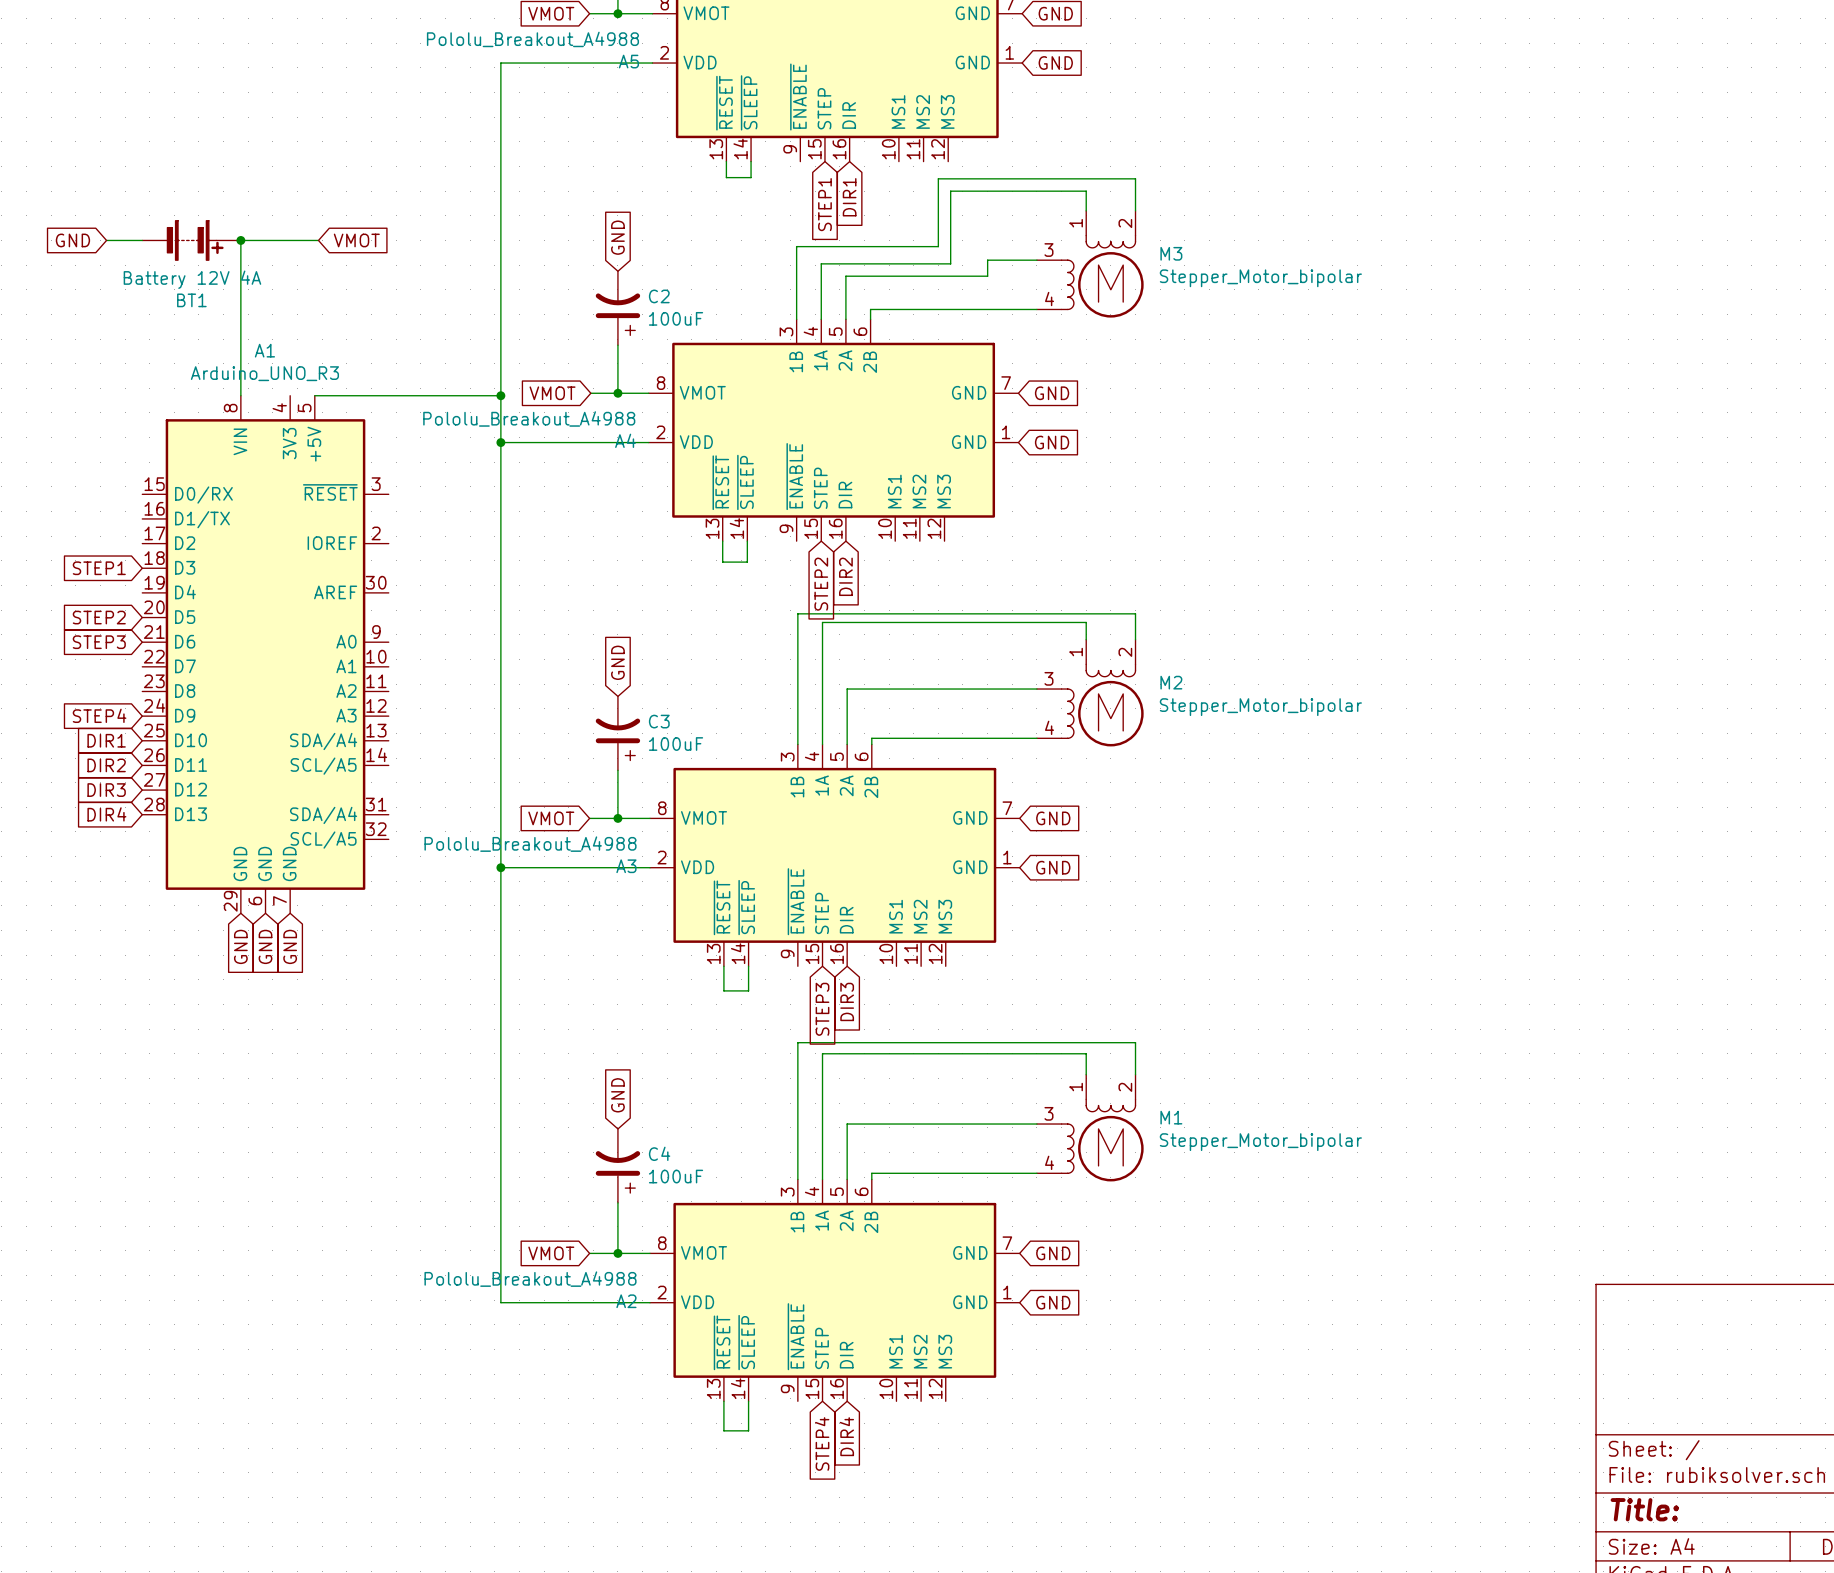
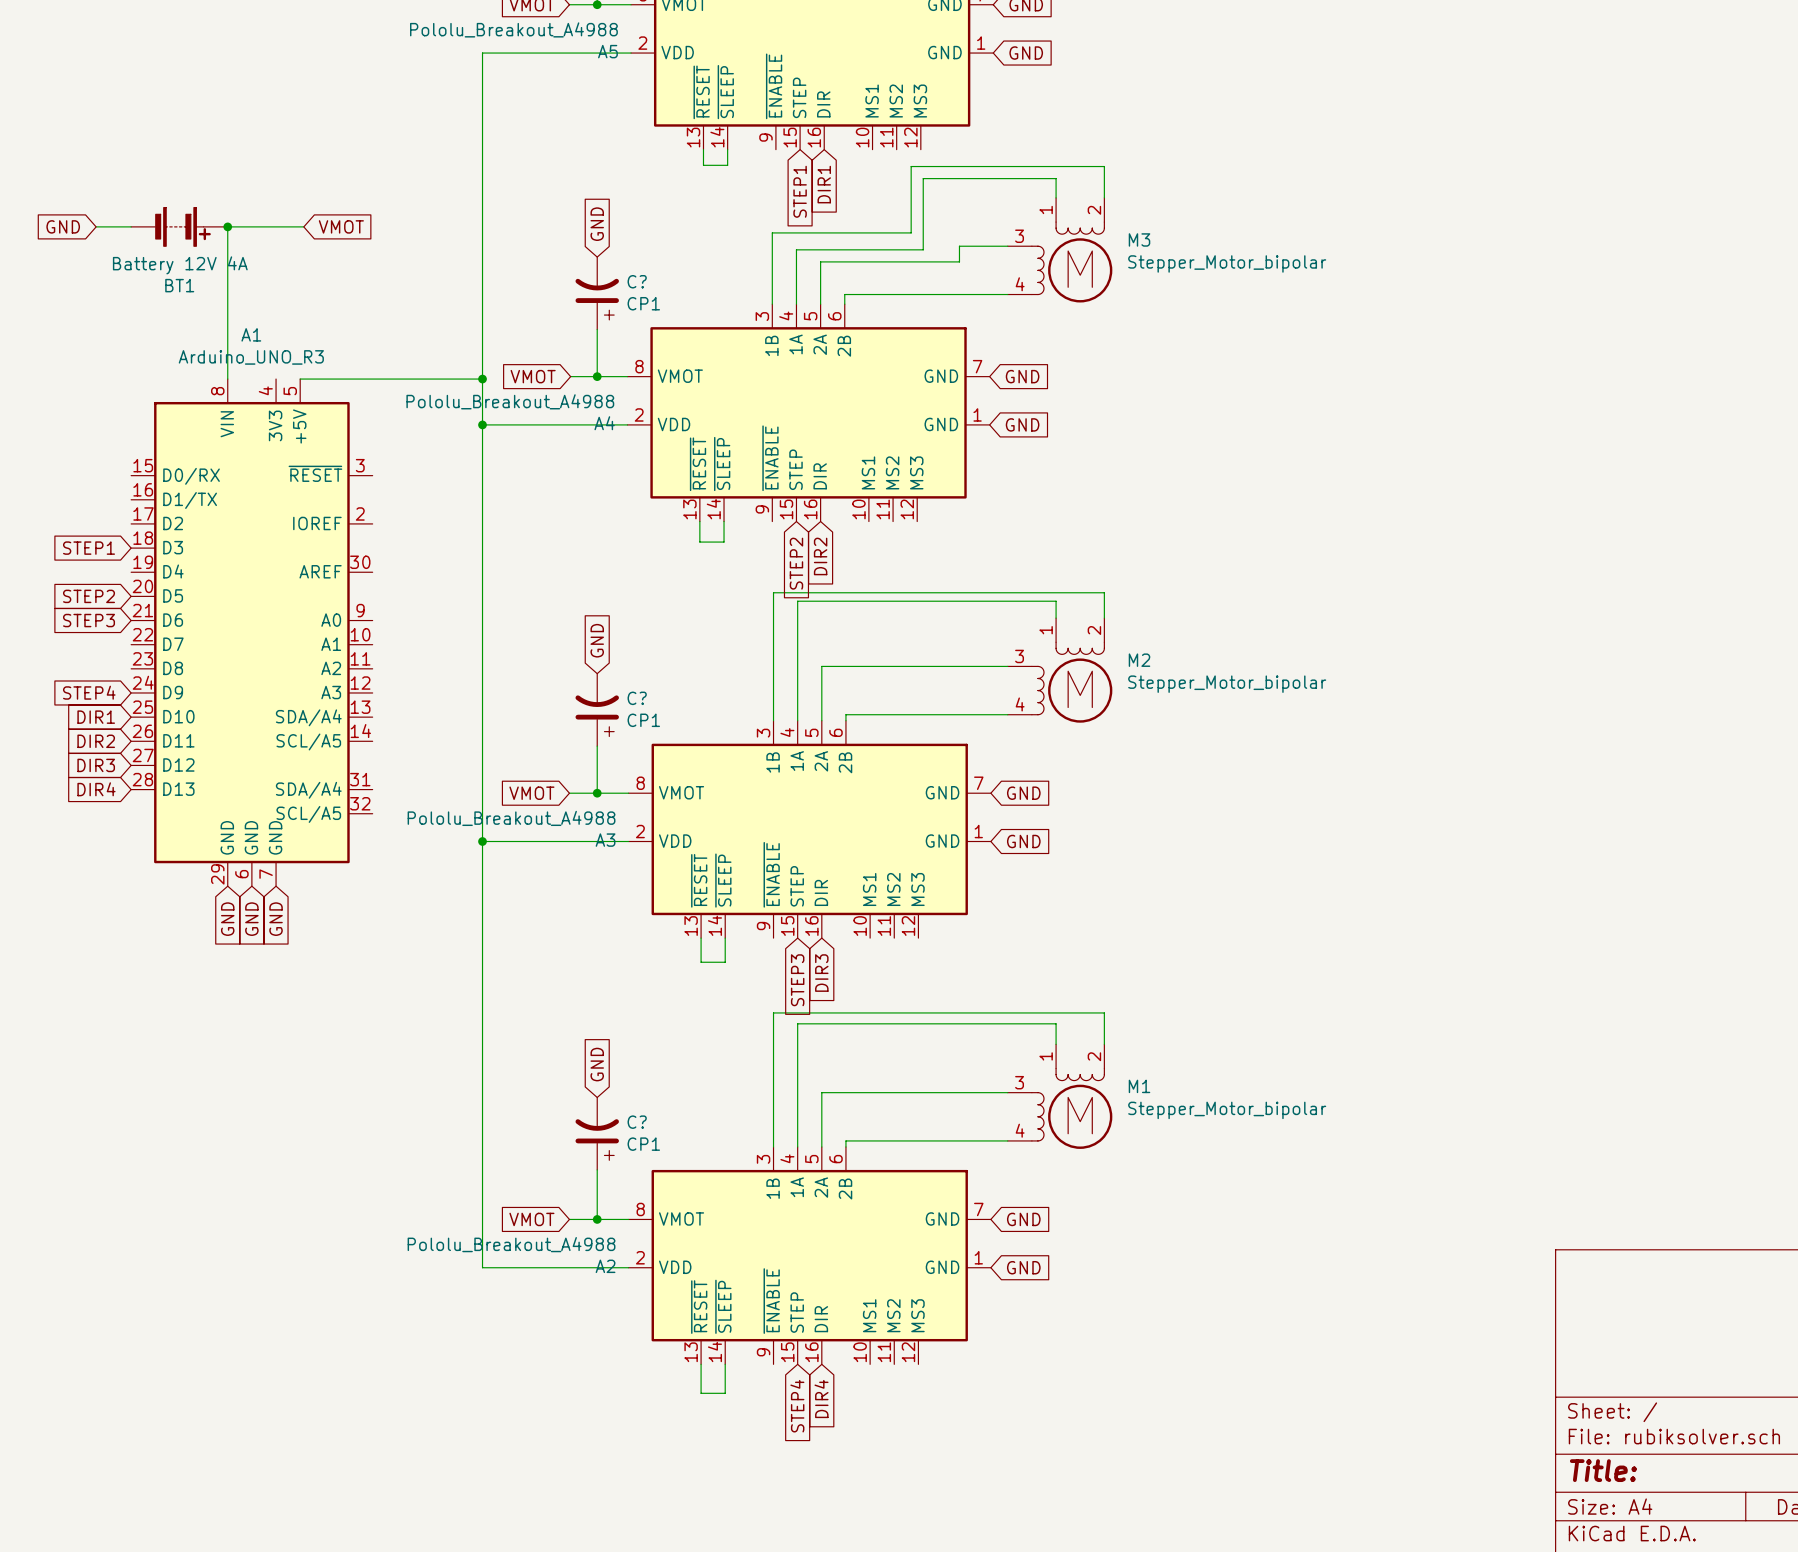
C2 name: C2 (659, 296) -> C? (637, 281)
C2 value: 100uF (676, 318) -> CP1 (643, 303)
C3 name: C3 (659, 721) -> C? (637, 698)
C3 value: 100uF (676, 744) -> CP1 (643, 720)
C4 name: C4 (659, 1153) -> C? (637, 1122)
C4 value: 100uF (676, 1176) -> CP1 (643, 1144)

